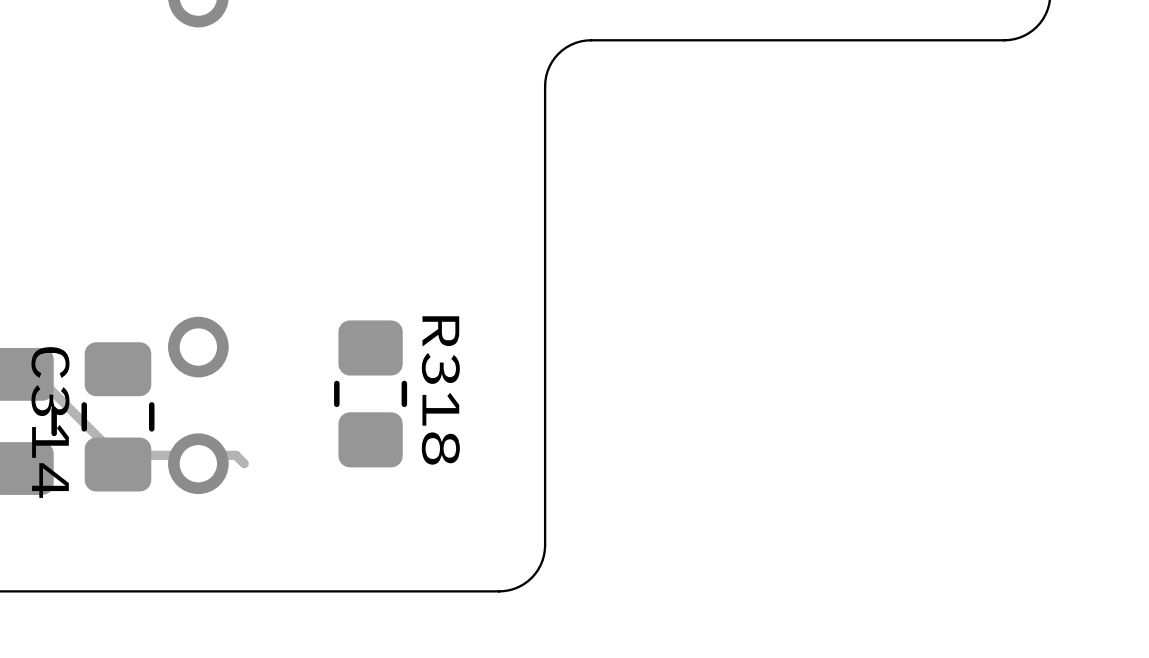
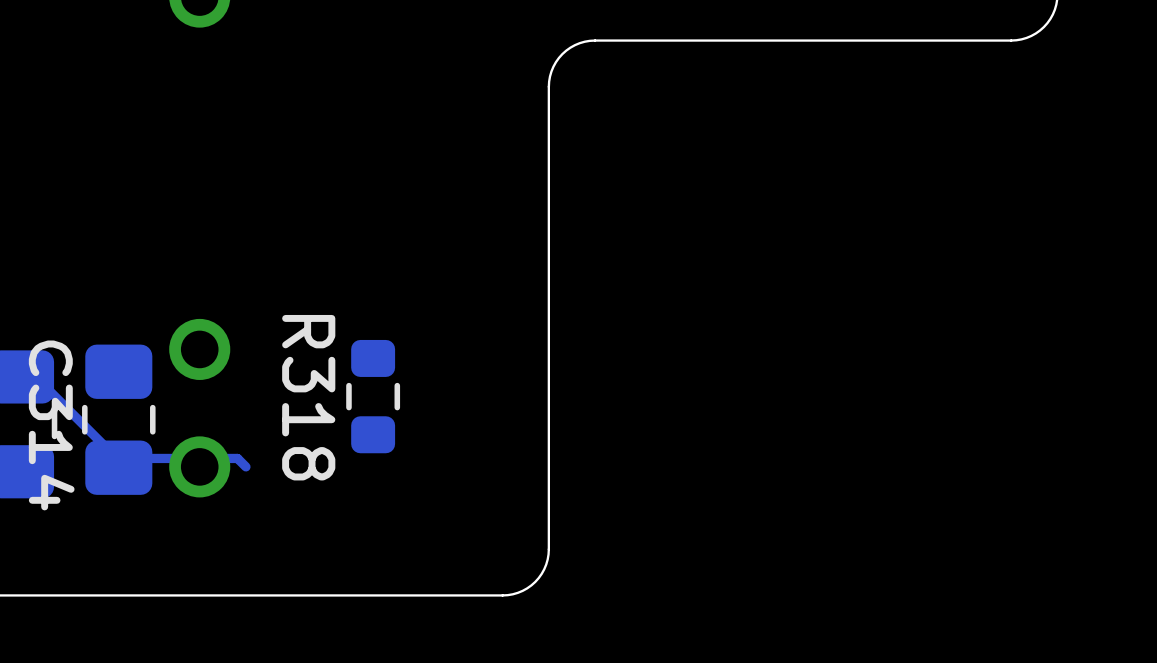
R318 footprint: [334, 320, 408, 468] -> [346, 339, 401, 454]
R318 name position: R318 (440, 390) -> R318 (308, 397)

